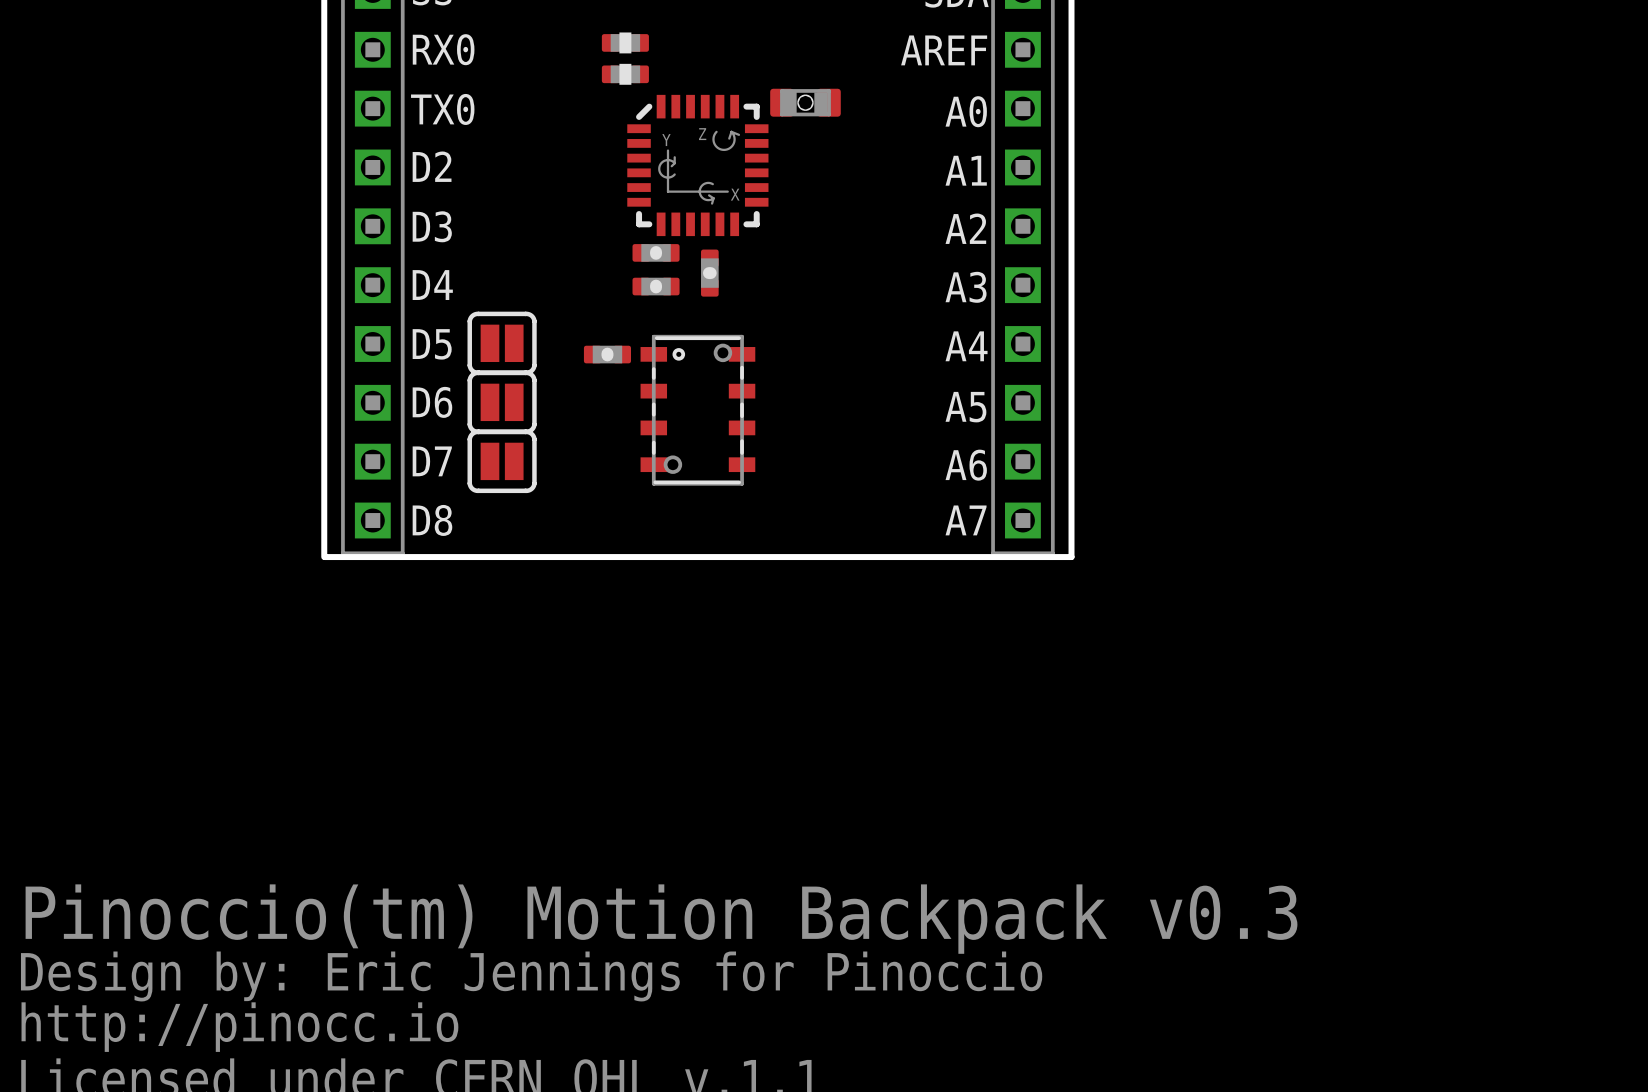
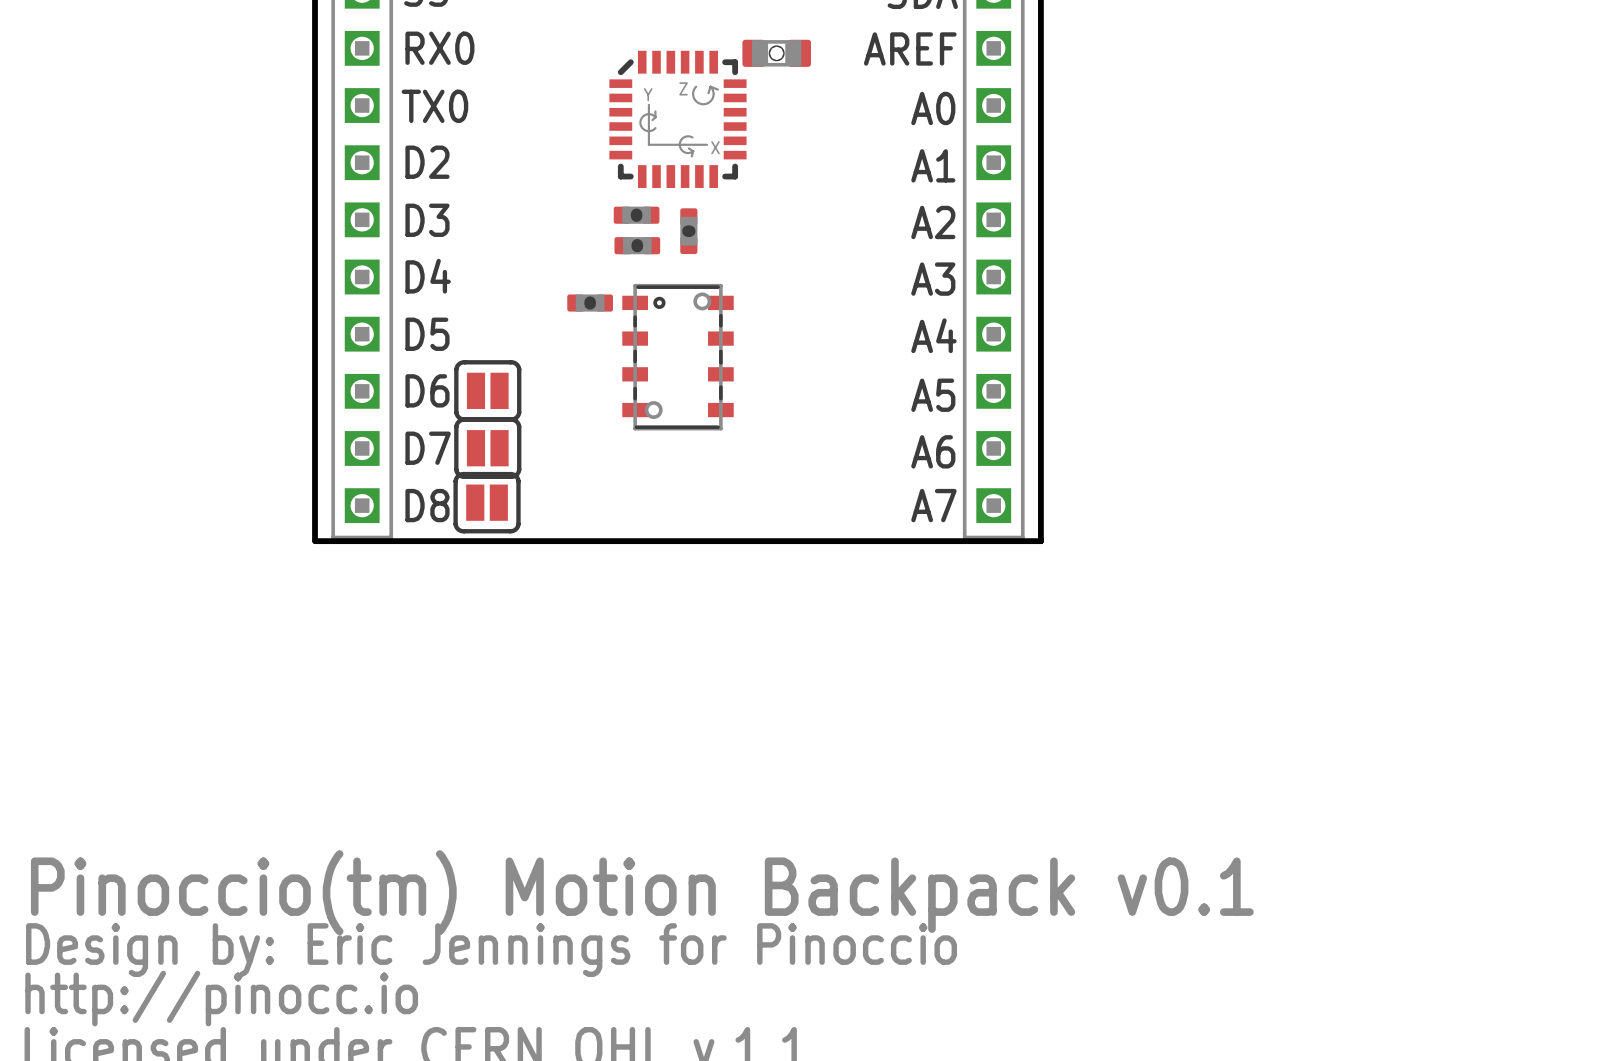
part: (625, 42) -> none
part: (625, 74) -> none
part position: (805, 102) -> (776, 53)
part position: (697, 165) -> (677, 119)
part: none -> (636, 215)
part position: (709, 273) -> (688, 231)
part: (656, 286) -> none
part: none -> (590, 303)
part position: (502, 343) -> (487, 502)
part: (607, 354) -> none
part position: (697, 410) -> (678, 357)
text: Pinoccio(tm) Motion Backpack v0.3 (661, 919) -> Pinoccio(tm) Motion Backpack v0.1 (642, 892)

